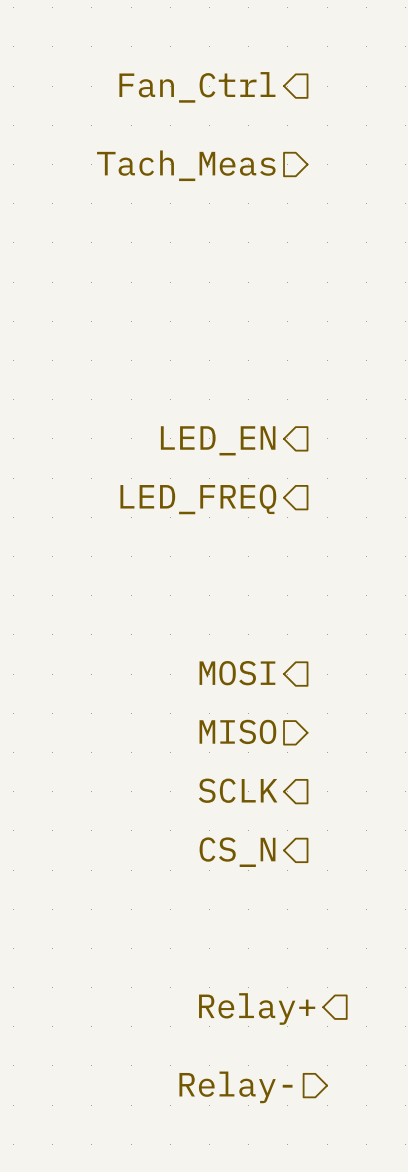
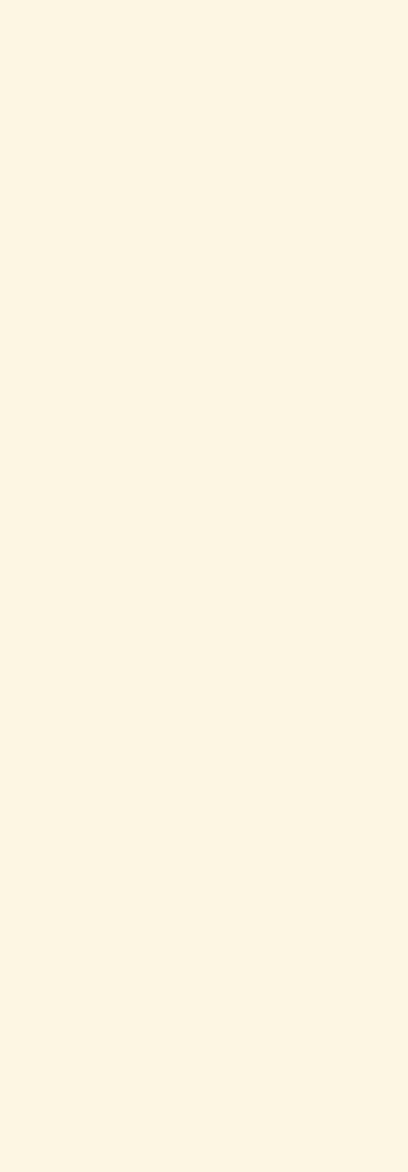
hierarchical label: Fan_Ctrl (197, 87) -> none
hierarchical label: Tach_Meas (186, 165) -> none
hierarchical label: LED_EN (218, 440) -> none
hierarchical label: LED_FREQ (198, 499) -> none
hierarchical label: MOSI (237, 673) -> none
hierarchical label: MISO (237, 731) -> none
hierarchical label: SCLK (238, 790) -> none
hierarchical label: CS_N (237, 852) -> none
hierarchical label: Relay+ (257, 1008) -> none
hierarchical label: Relay- (235, 1087) -> none

